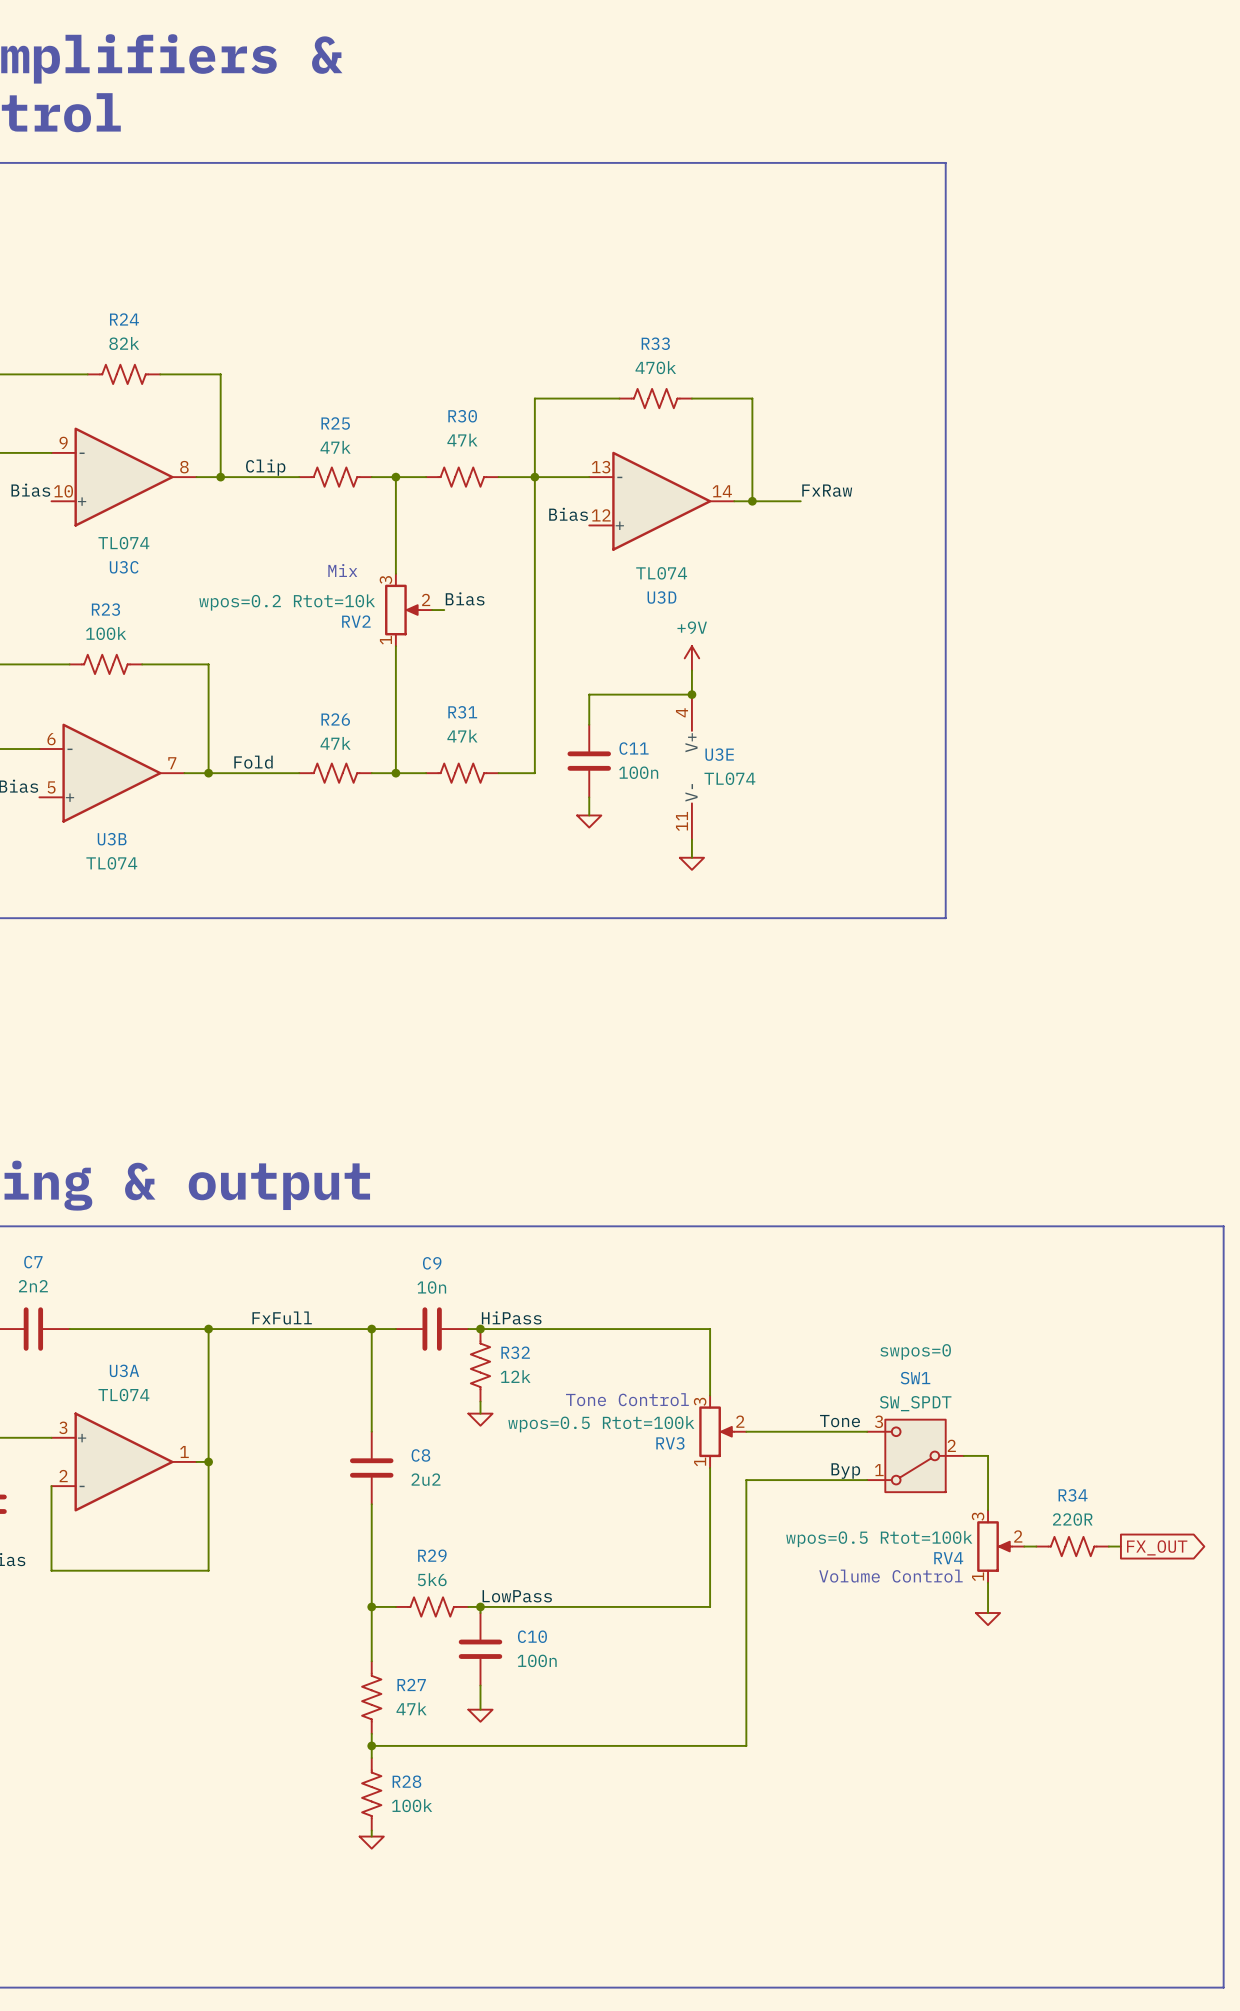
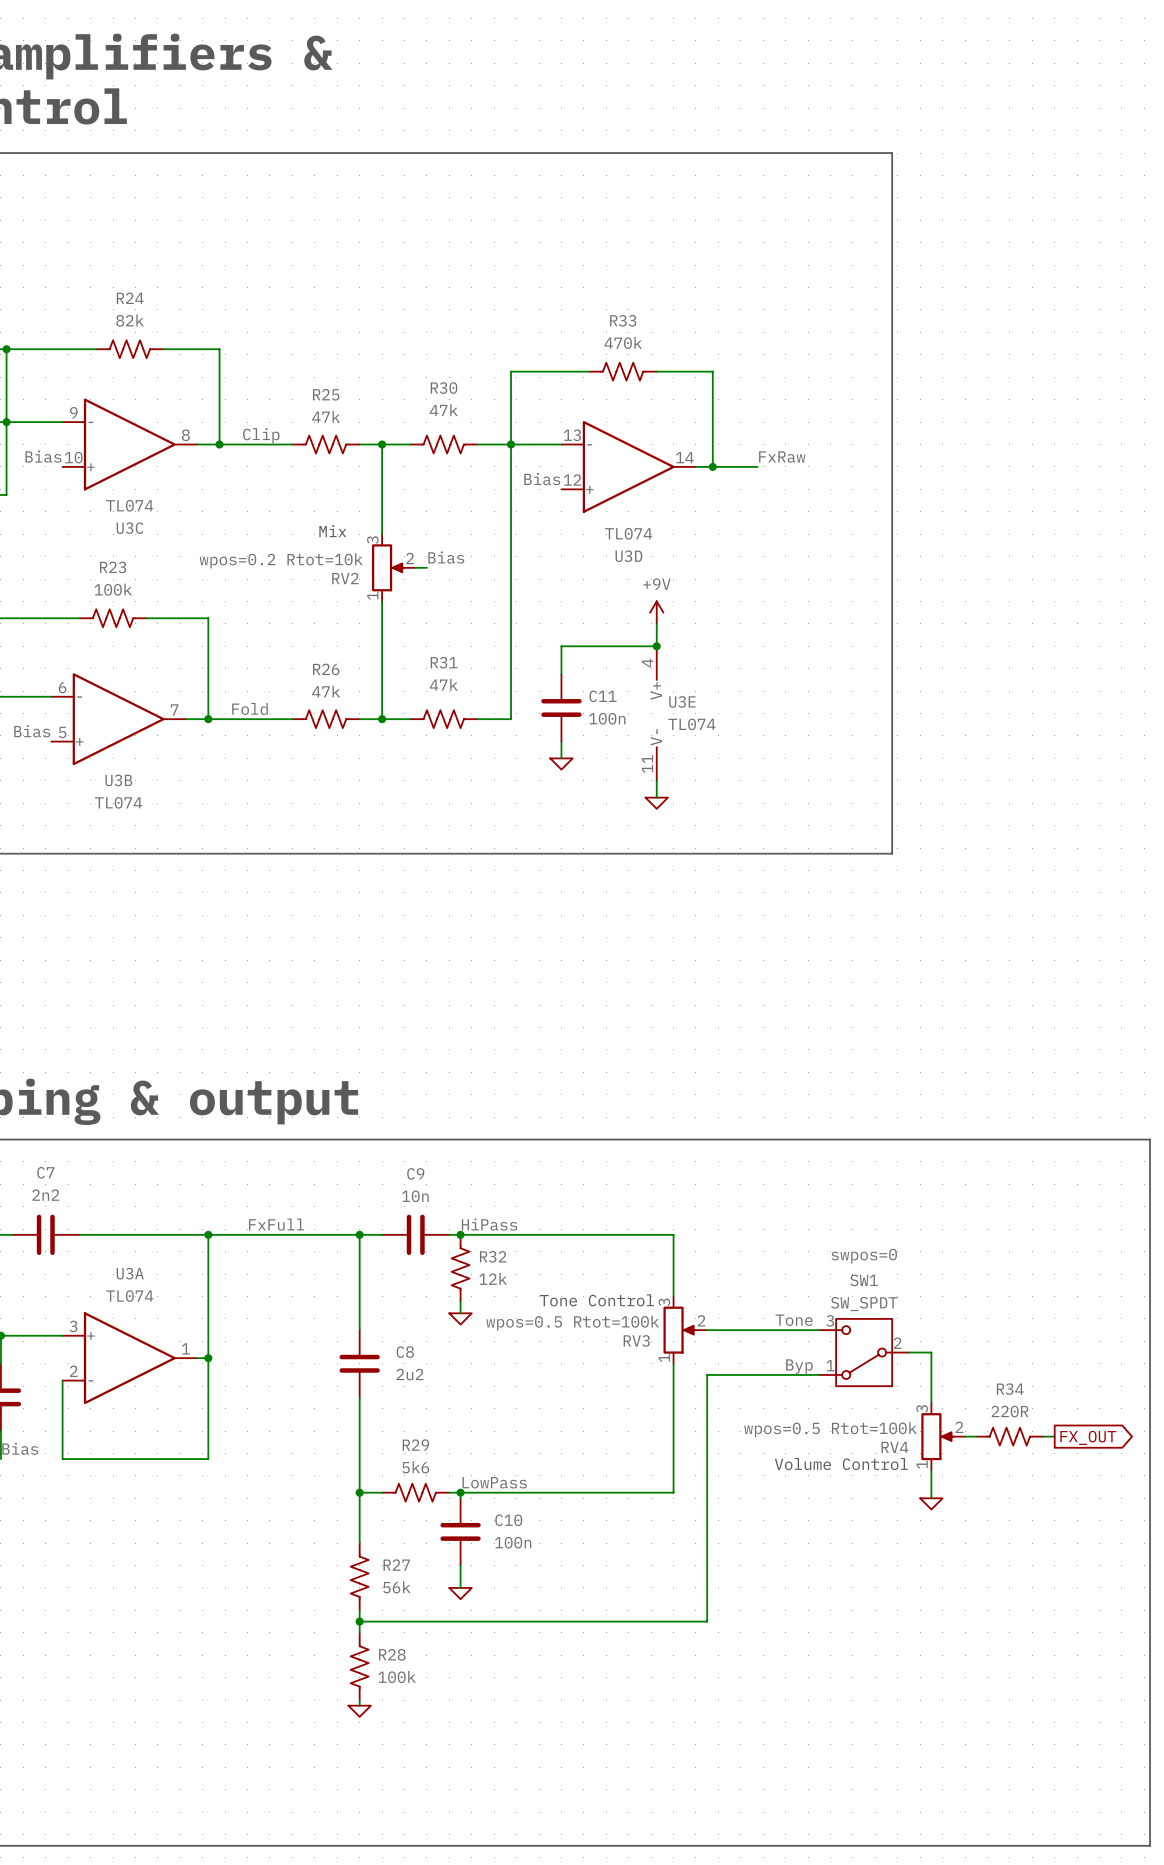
R27 value: 47k (411, 1708) -> 56k (396, 1587)

